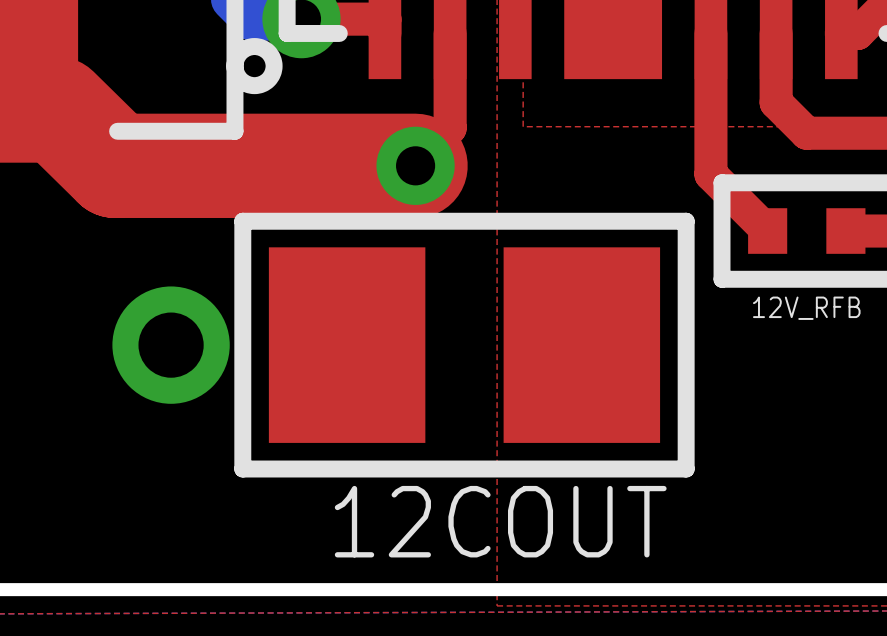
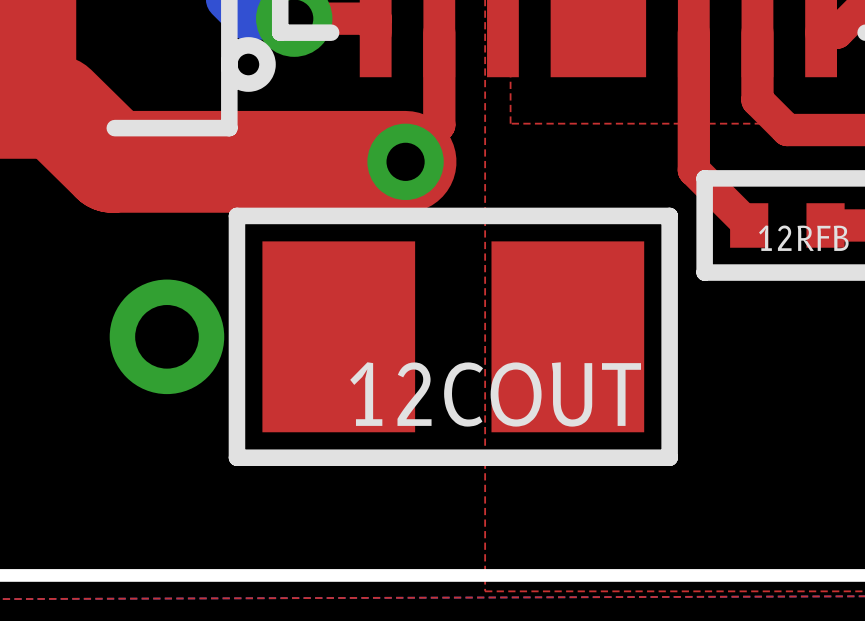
12V_RFB name: 12V_RFB (806, 308) -> 12RFB (803, 238)
12COUT name position: 12COUT (500, 521) -> 12COUT (495, 394)

